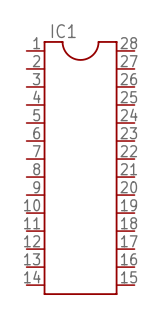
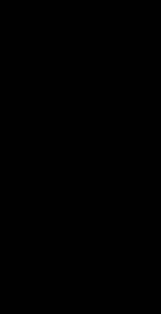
IC1: (80, 168) -> none

